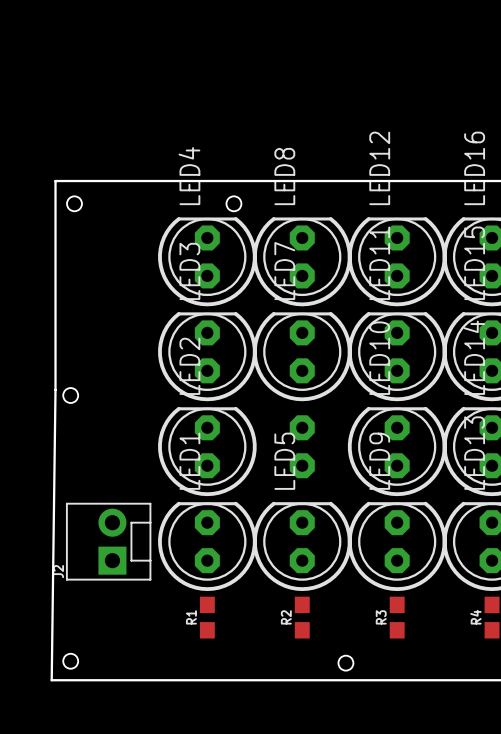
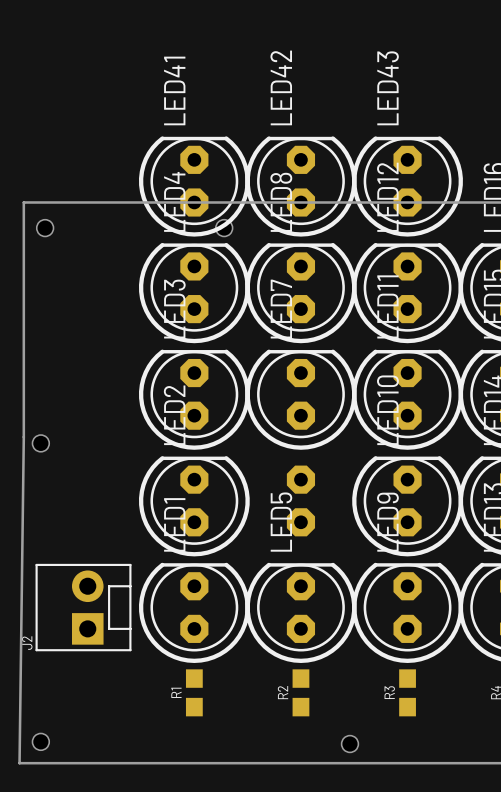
LED41: none -> (194, 186)
LED42: none -> (300, 186)
LED43: none -> (407, 186)

